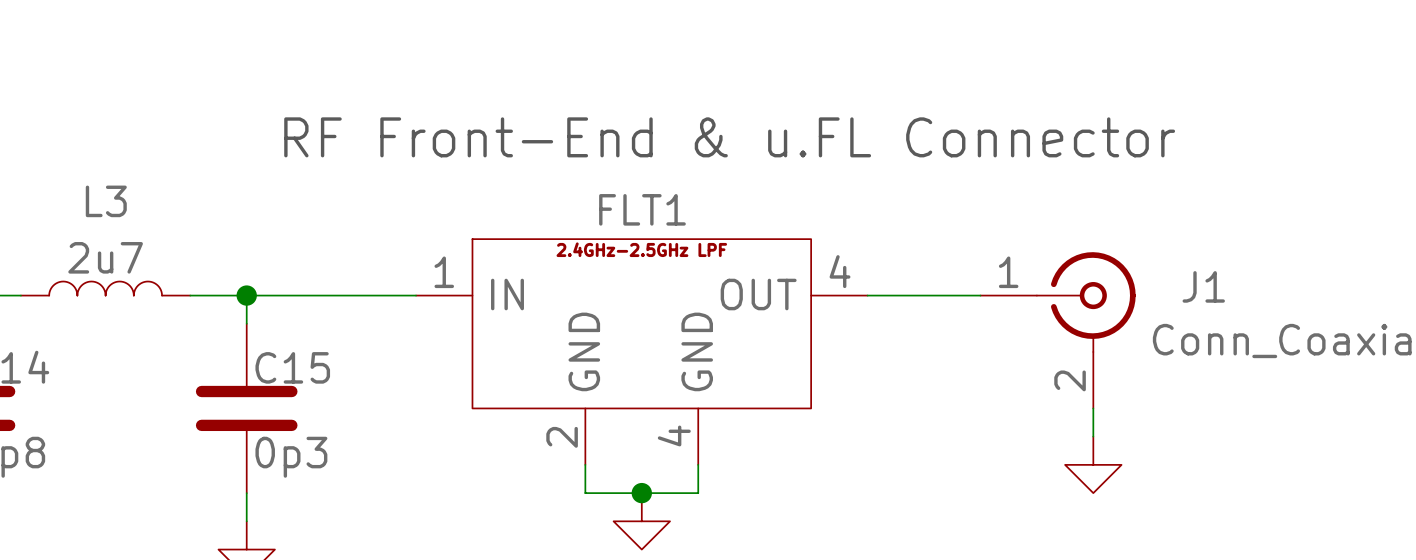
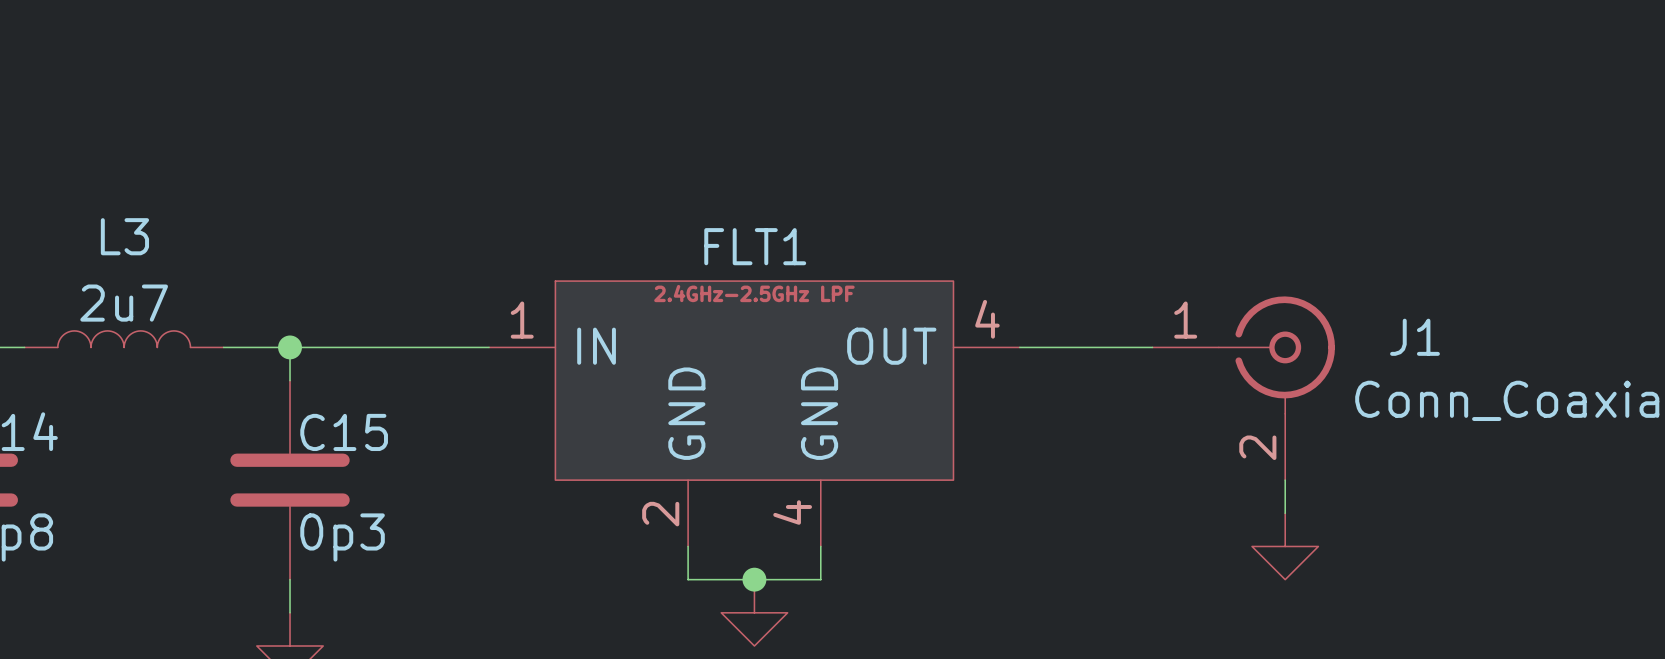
text: RF Front-End & u.FL Connector (729, 137) -> none

